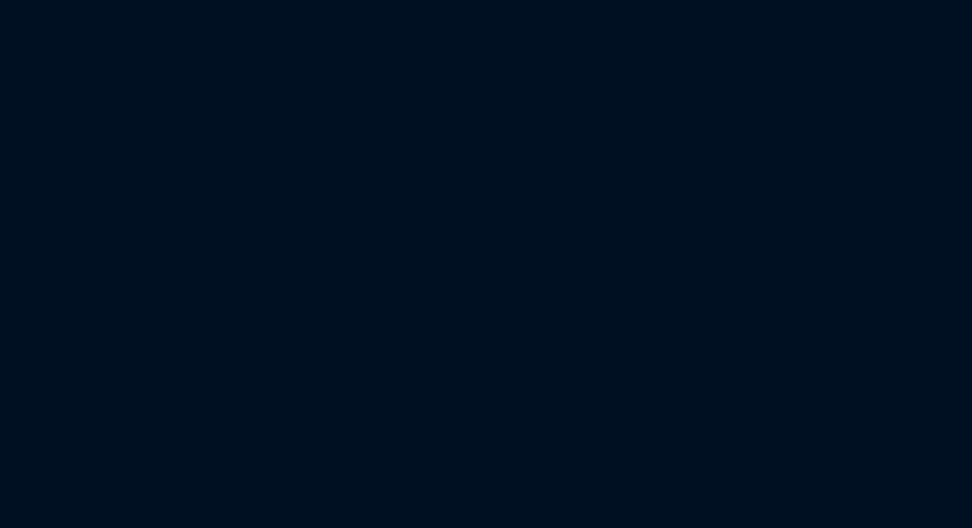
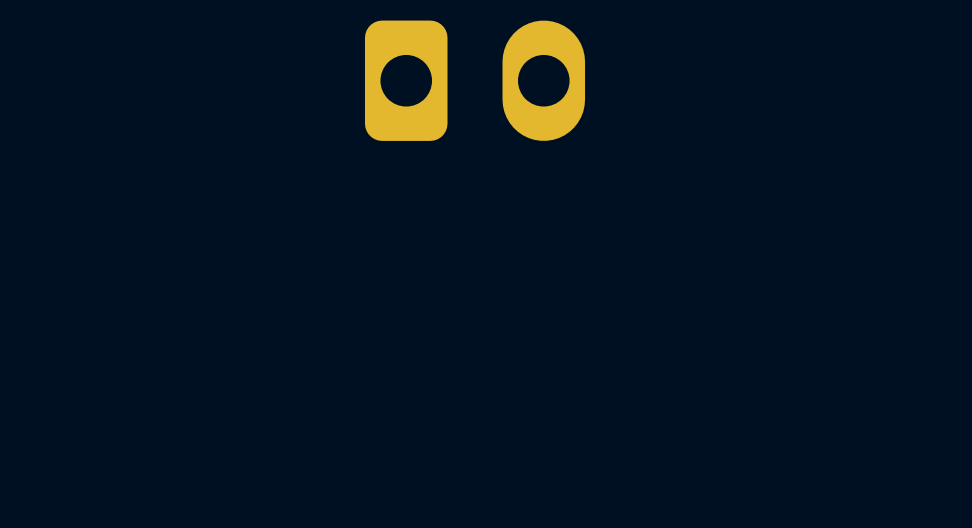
part: none -> (475, 80)

